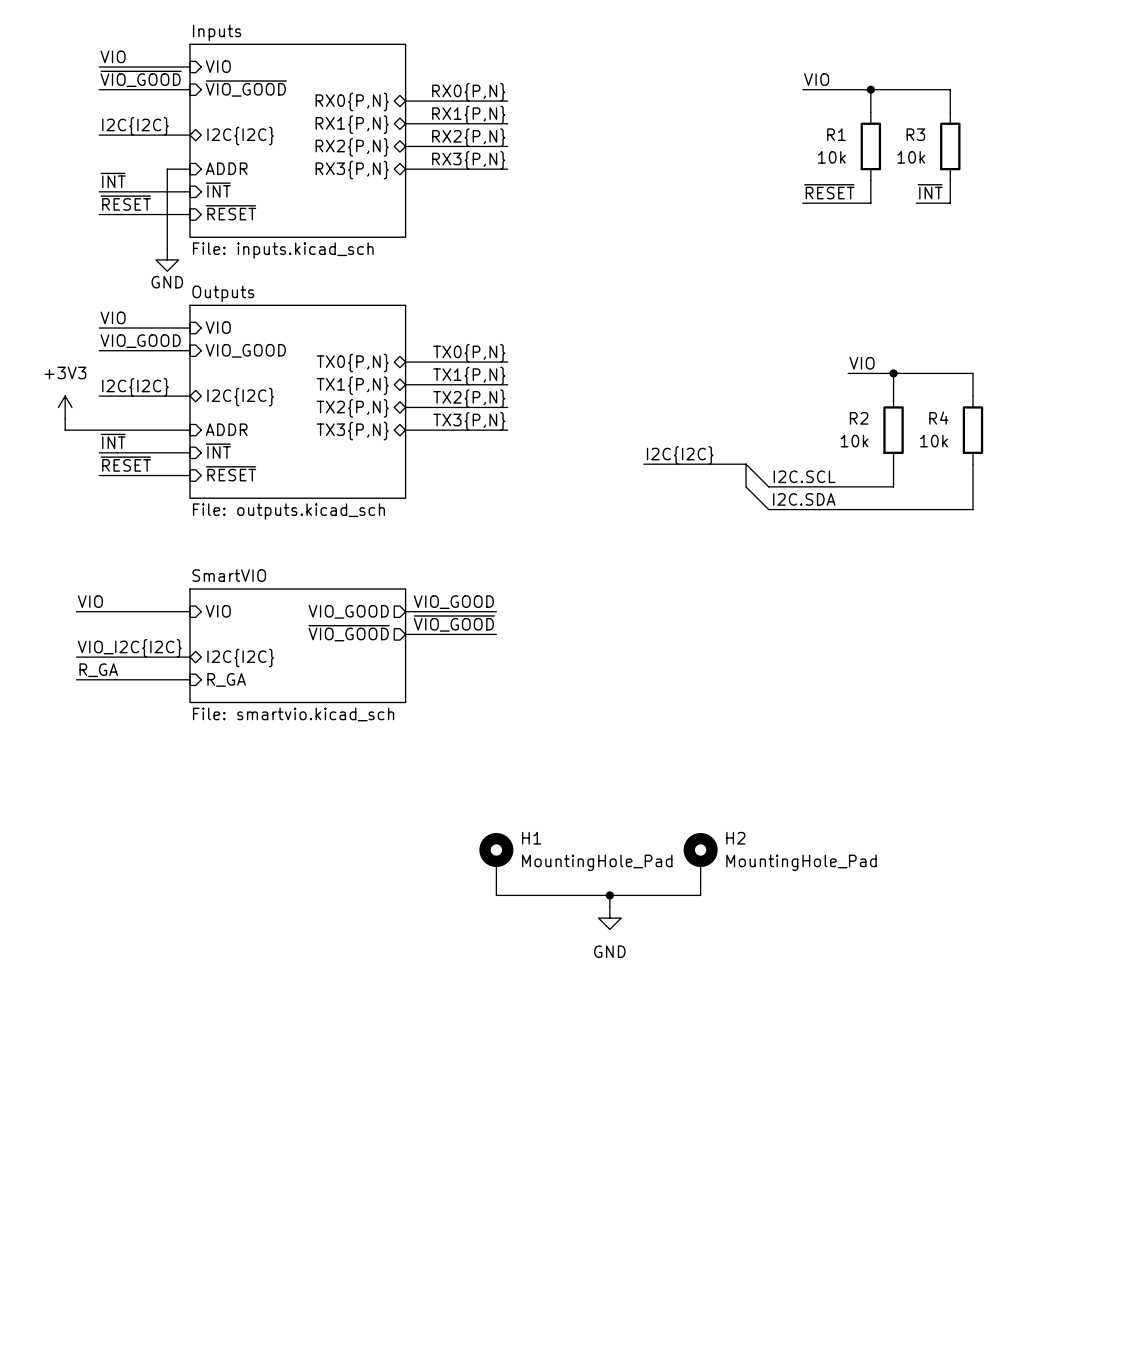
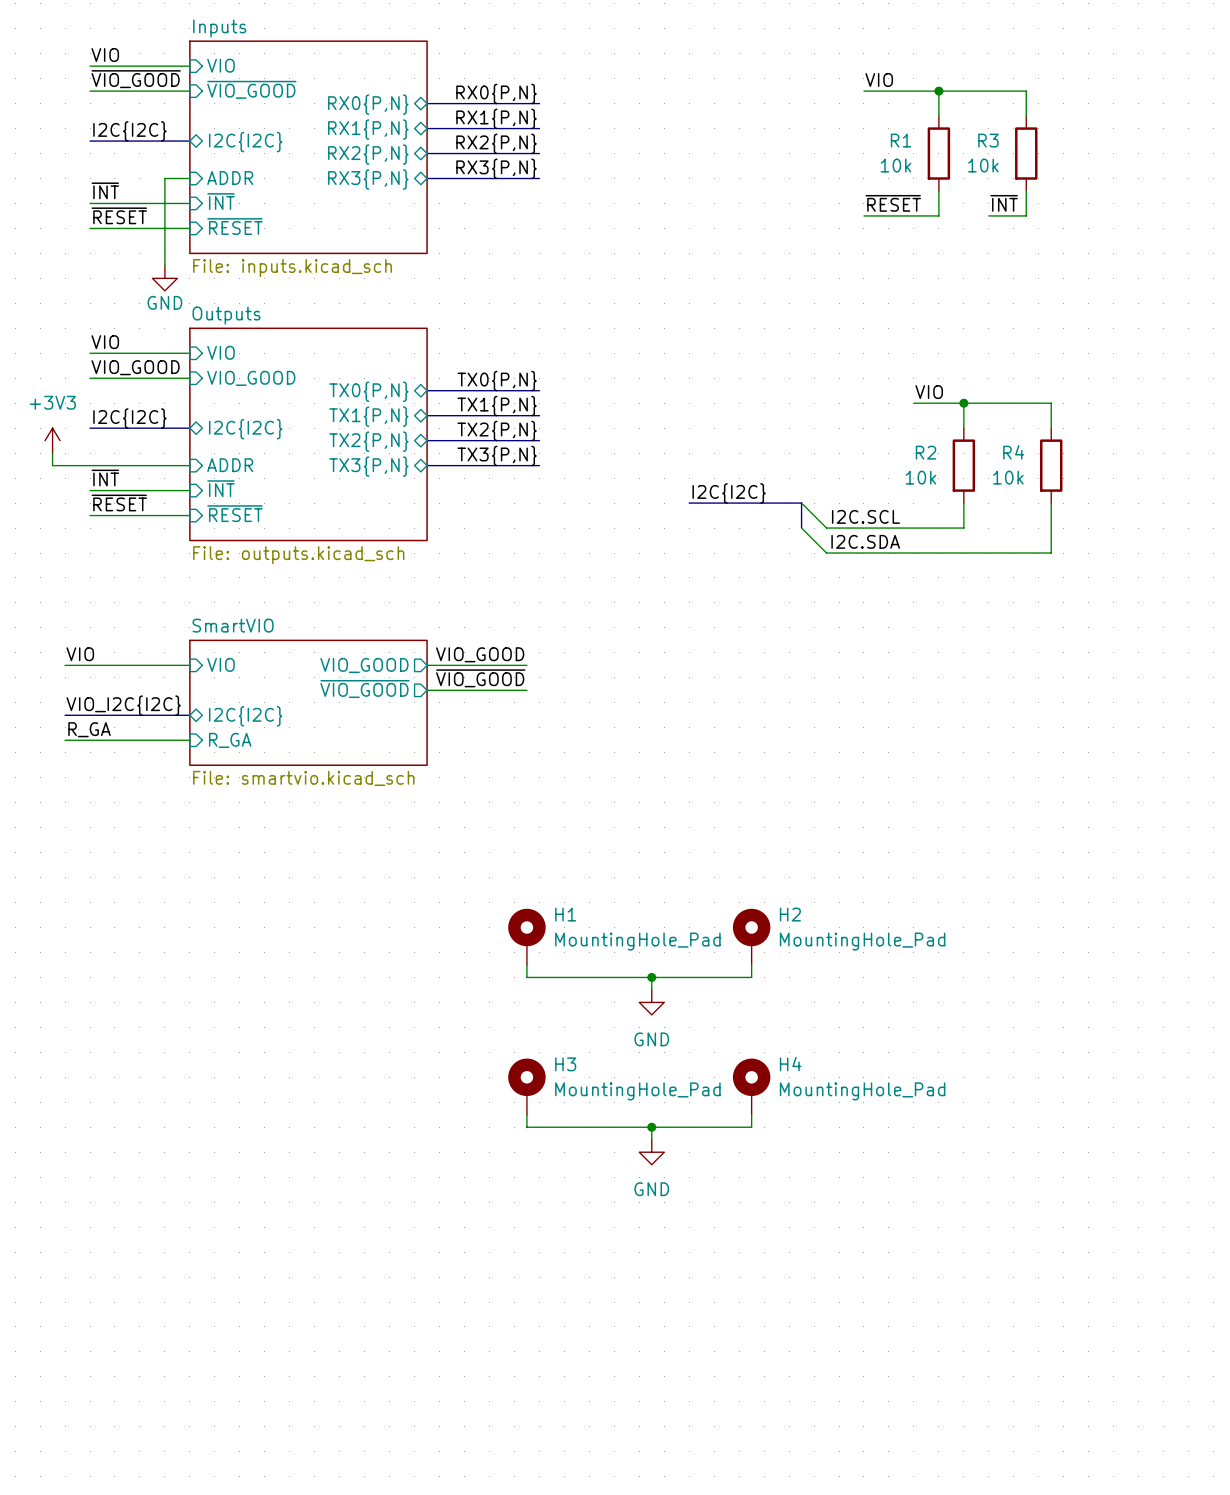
H3: none -> MountingHole_Pad (526, 1086)
H4: none -> MountingHole_Pad (751, 1086)
wire: none -> (526, 1114) (526, 1127) (751, 1127) (751, 1114)
wire: none -> (651, 1127) (651, 1139)
junction: none -> (651, 1127)
power symbol: none -> GND (651, 1152)

